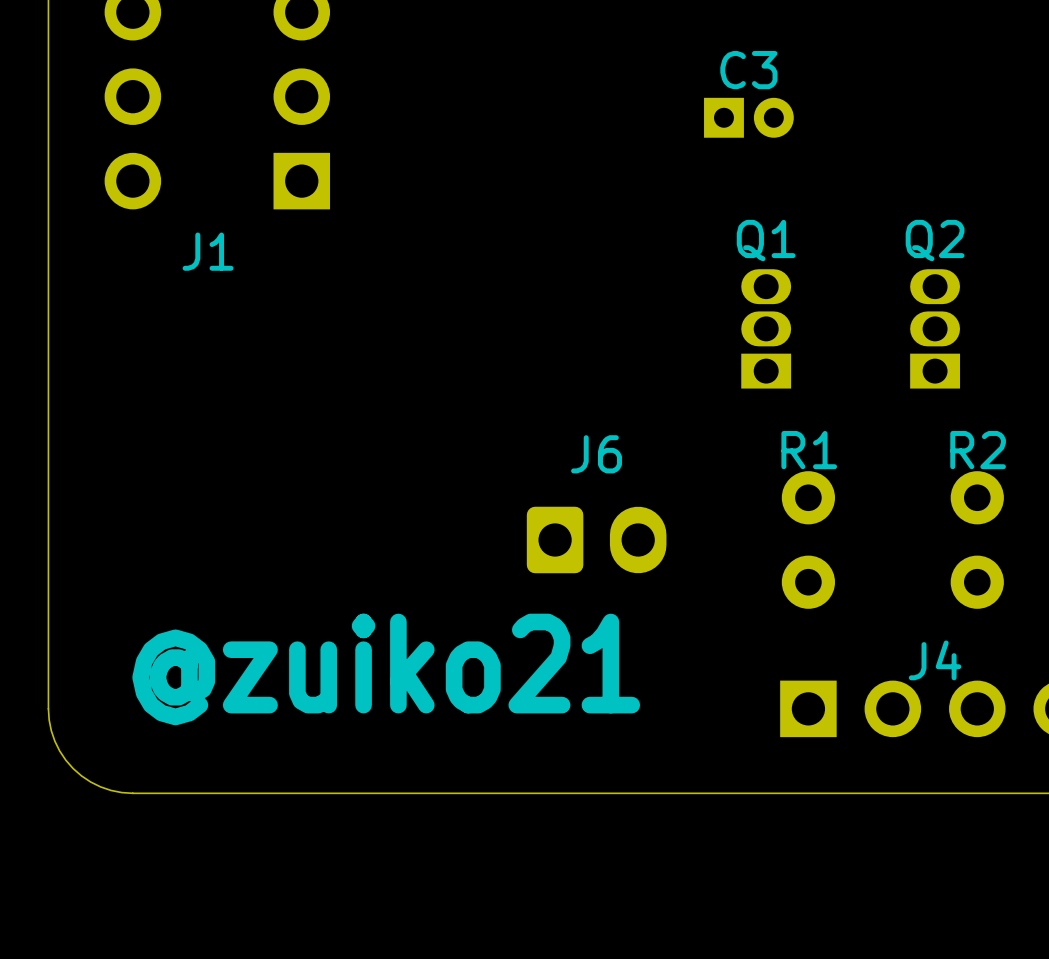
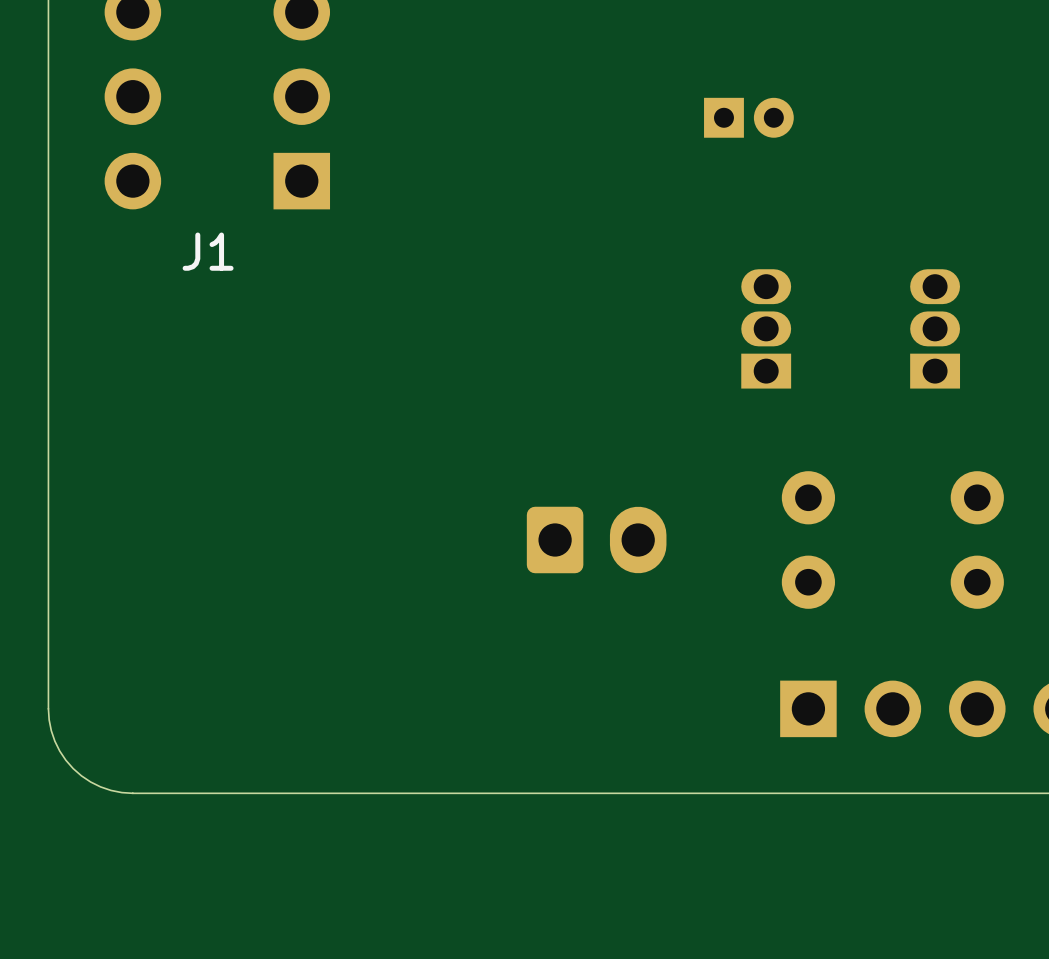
C3 name: C3 (748, 70) -> none
Q1 name: Q1 (766, 240) -> none
Q2 name: Q2 (935, 240) -> none
R1 name: R1 (809, 450) -> none
R2 name: R2 (978, 450) -> none
J6 name: J6 (596, 454) -> none
J4 name: J4 (935, 660) -> none
text: @zuiko21 (386, 669) -> none

